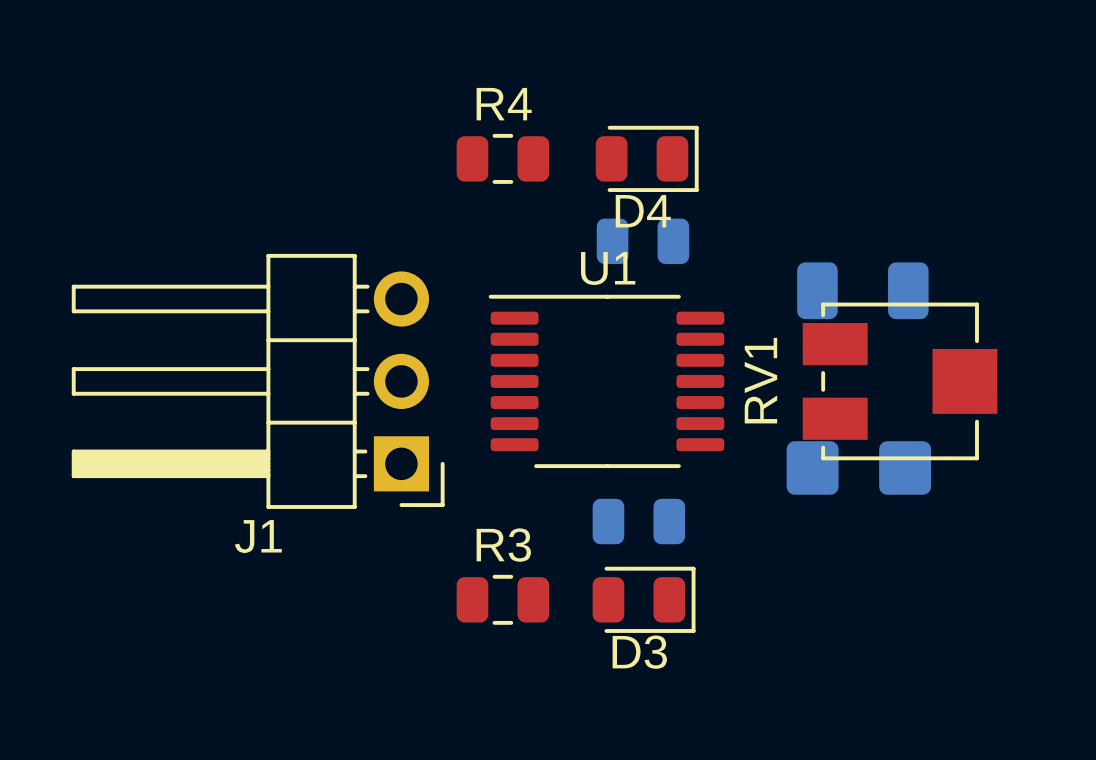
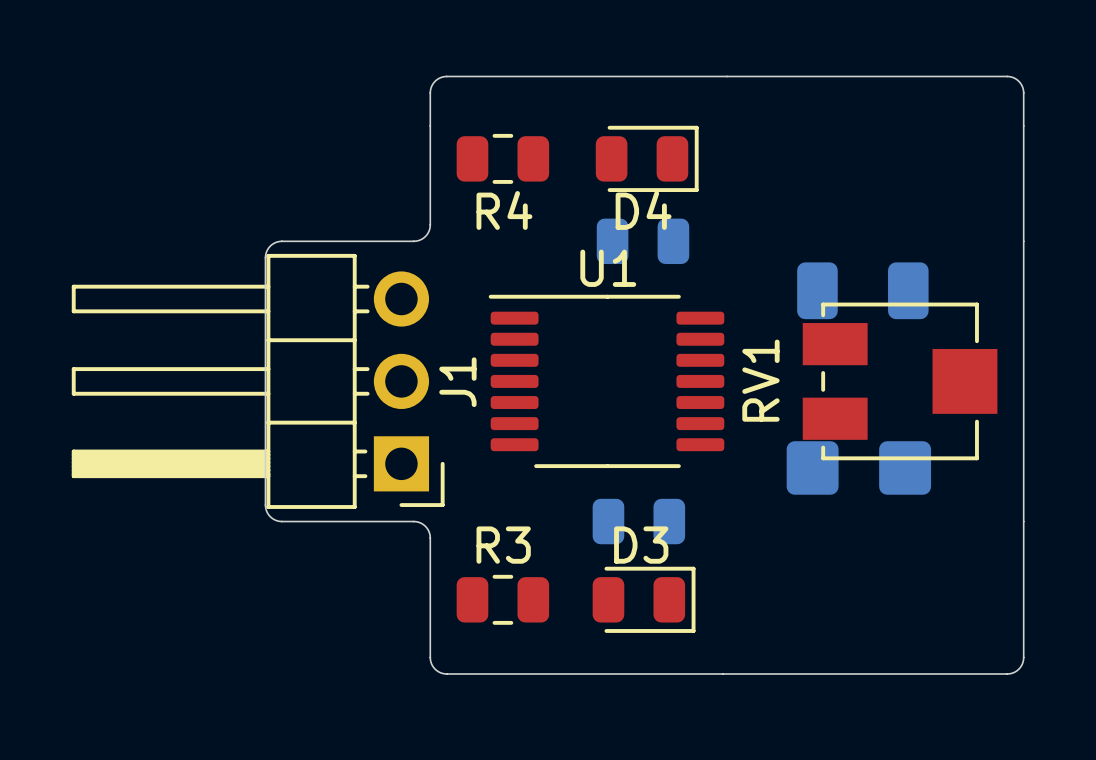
board edge: none -> (446, 76) (1007, 76) (1018, 81) (1023, 92) (1023, 657) (1018, 669) (1007, 674) (442, 673) (433, 667) (430, 659) (430, 538) (425, 526) (413, 521) (281, 521) (270, 516) (265, 505) (266, 251) (271, 244) (279, 241) (413, 241) (425, 236) (430, 224) (430, 90) (436, 79) (446, 76)
R4 name position: R4 (504, 104) -> R4 (504, 210)
J1 name rotation: 0° (258, 536) -> 90° counterclockwise (457, 382)
J1 name position: J1 (258, 536) -> J1 (457, 382)
D3 name position: D3 (639, 652) -> D3 (641, 545)

